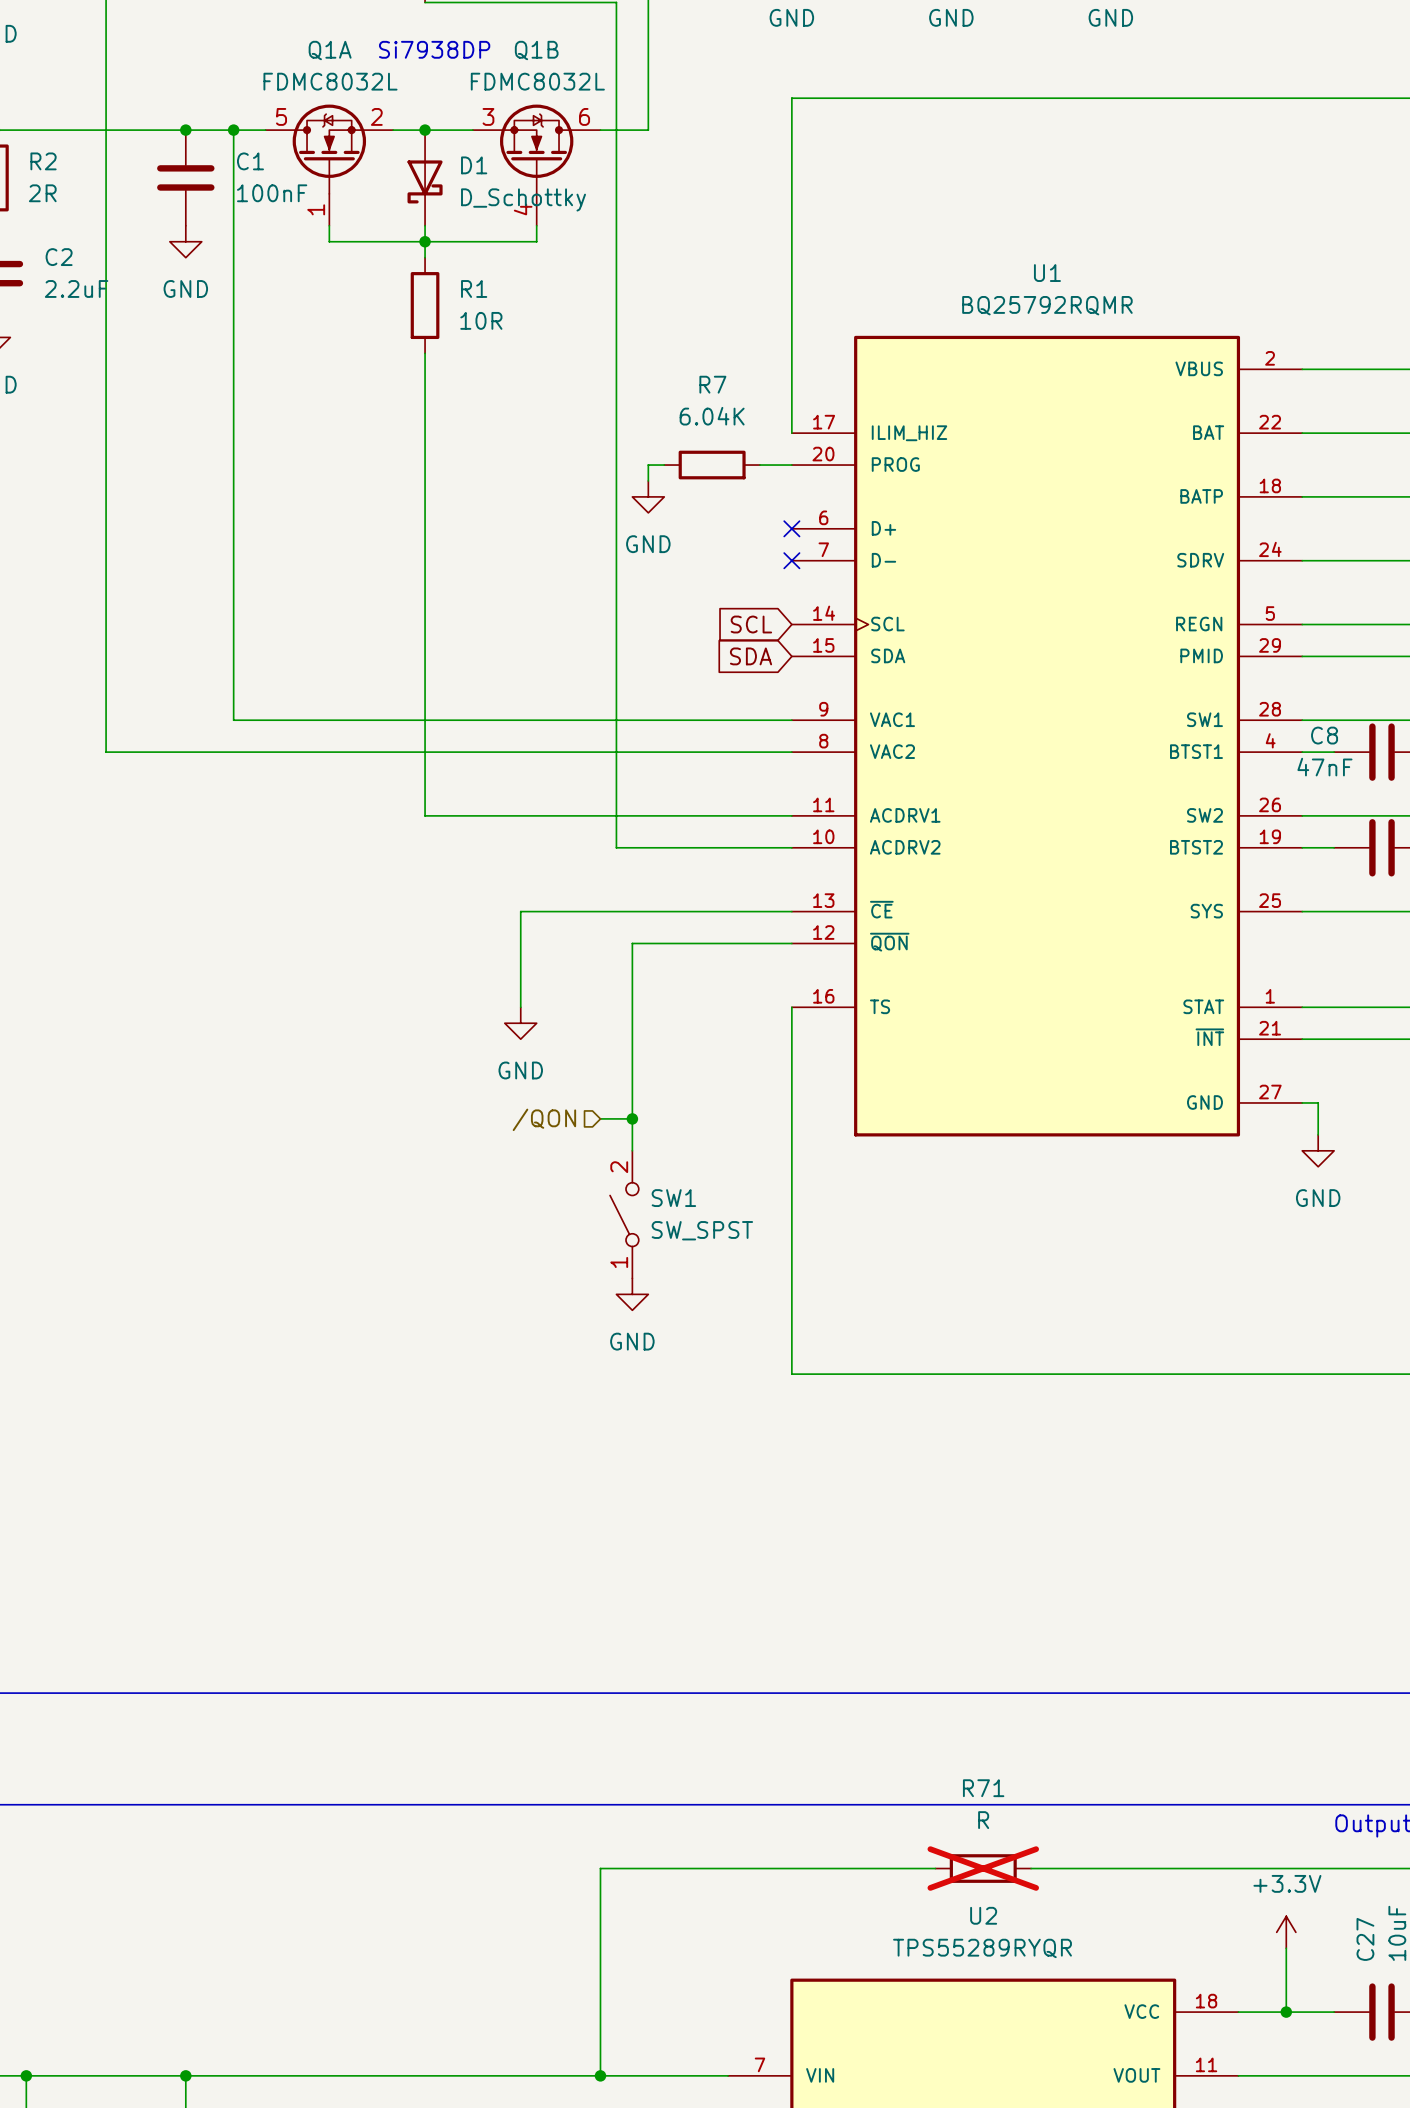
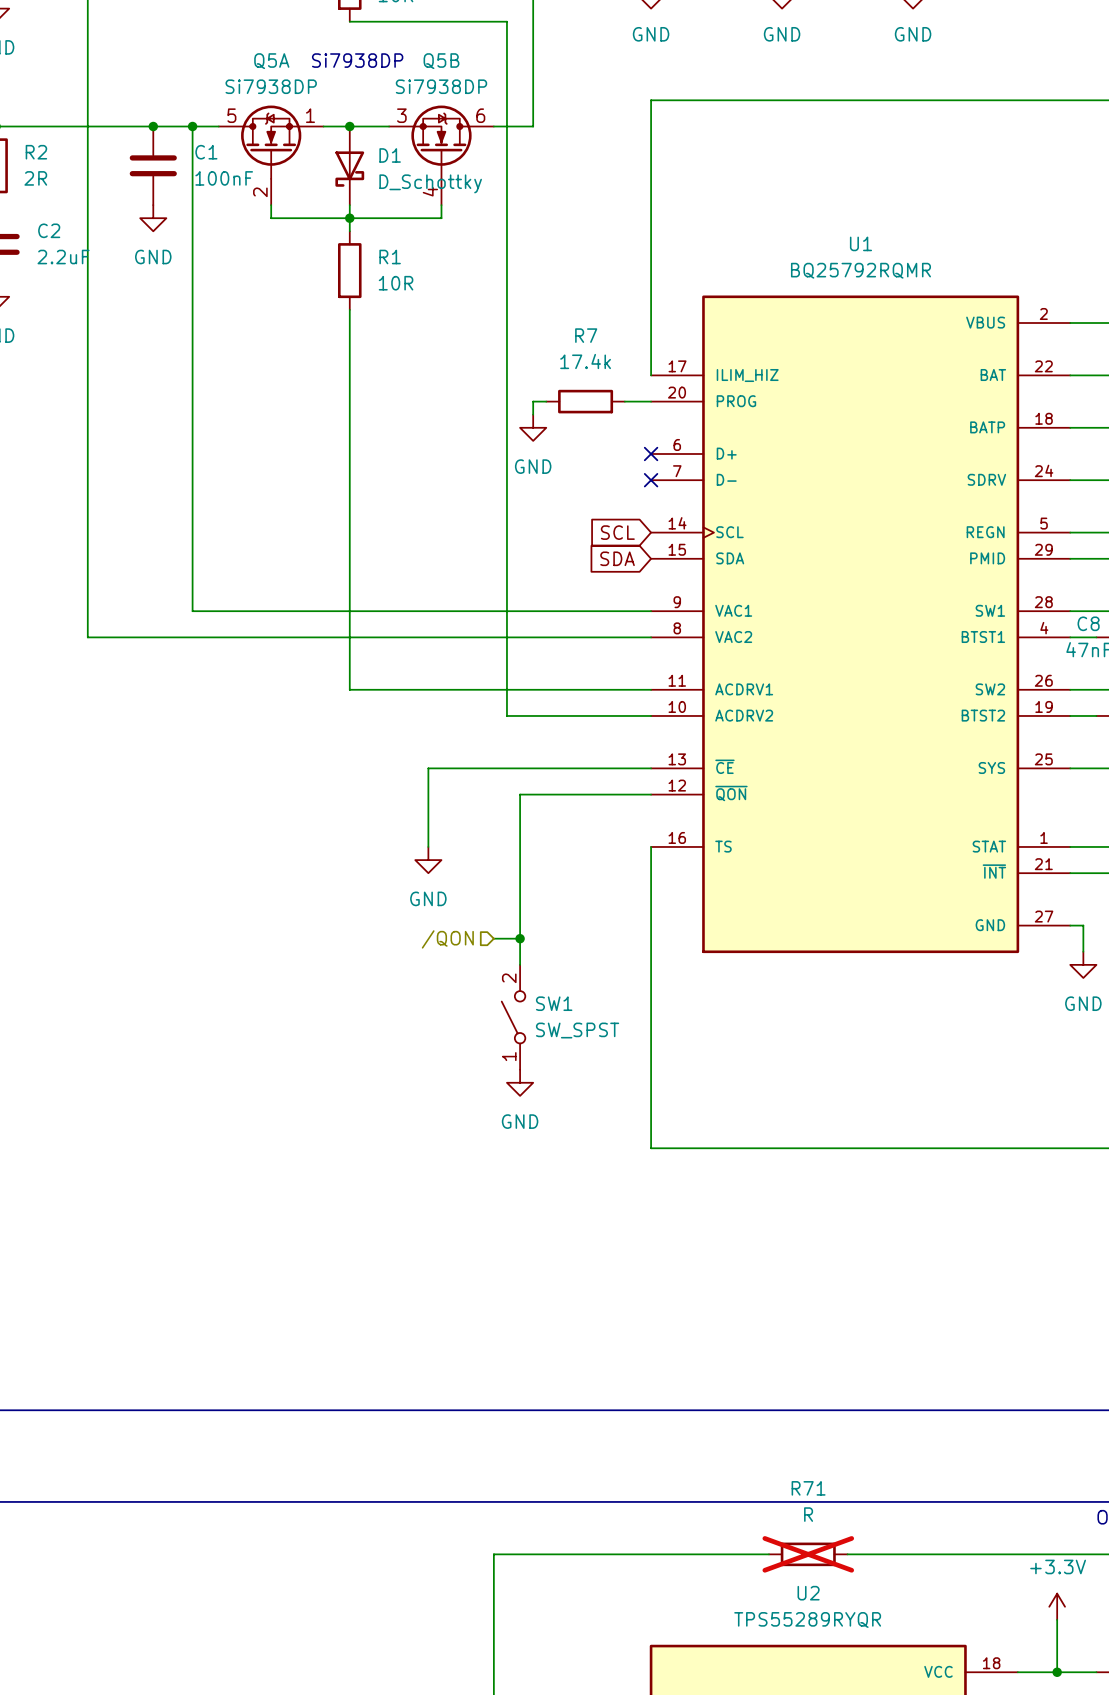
Q1A name: Q1A (330, 50) -> Q5A (271, 61)
Q1B name: Q1B (536, 50) -> Q5B (441, 61)
Q1A value: FDMC8032L (330, 81) -> Si7938DP (271, 86)
Q1B value: FDMC8032L (537, 81) -> Si7938DP (441, 86)
Q1A pin number: 2 (376, 116) -> 1 (310, 115)
Q1A pin number: 1 (316, 209) -> 2 (260, 192)
R7 value: 6.04K (712, 416) -> 17.4k (585, 361)

